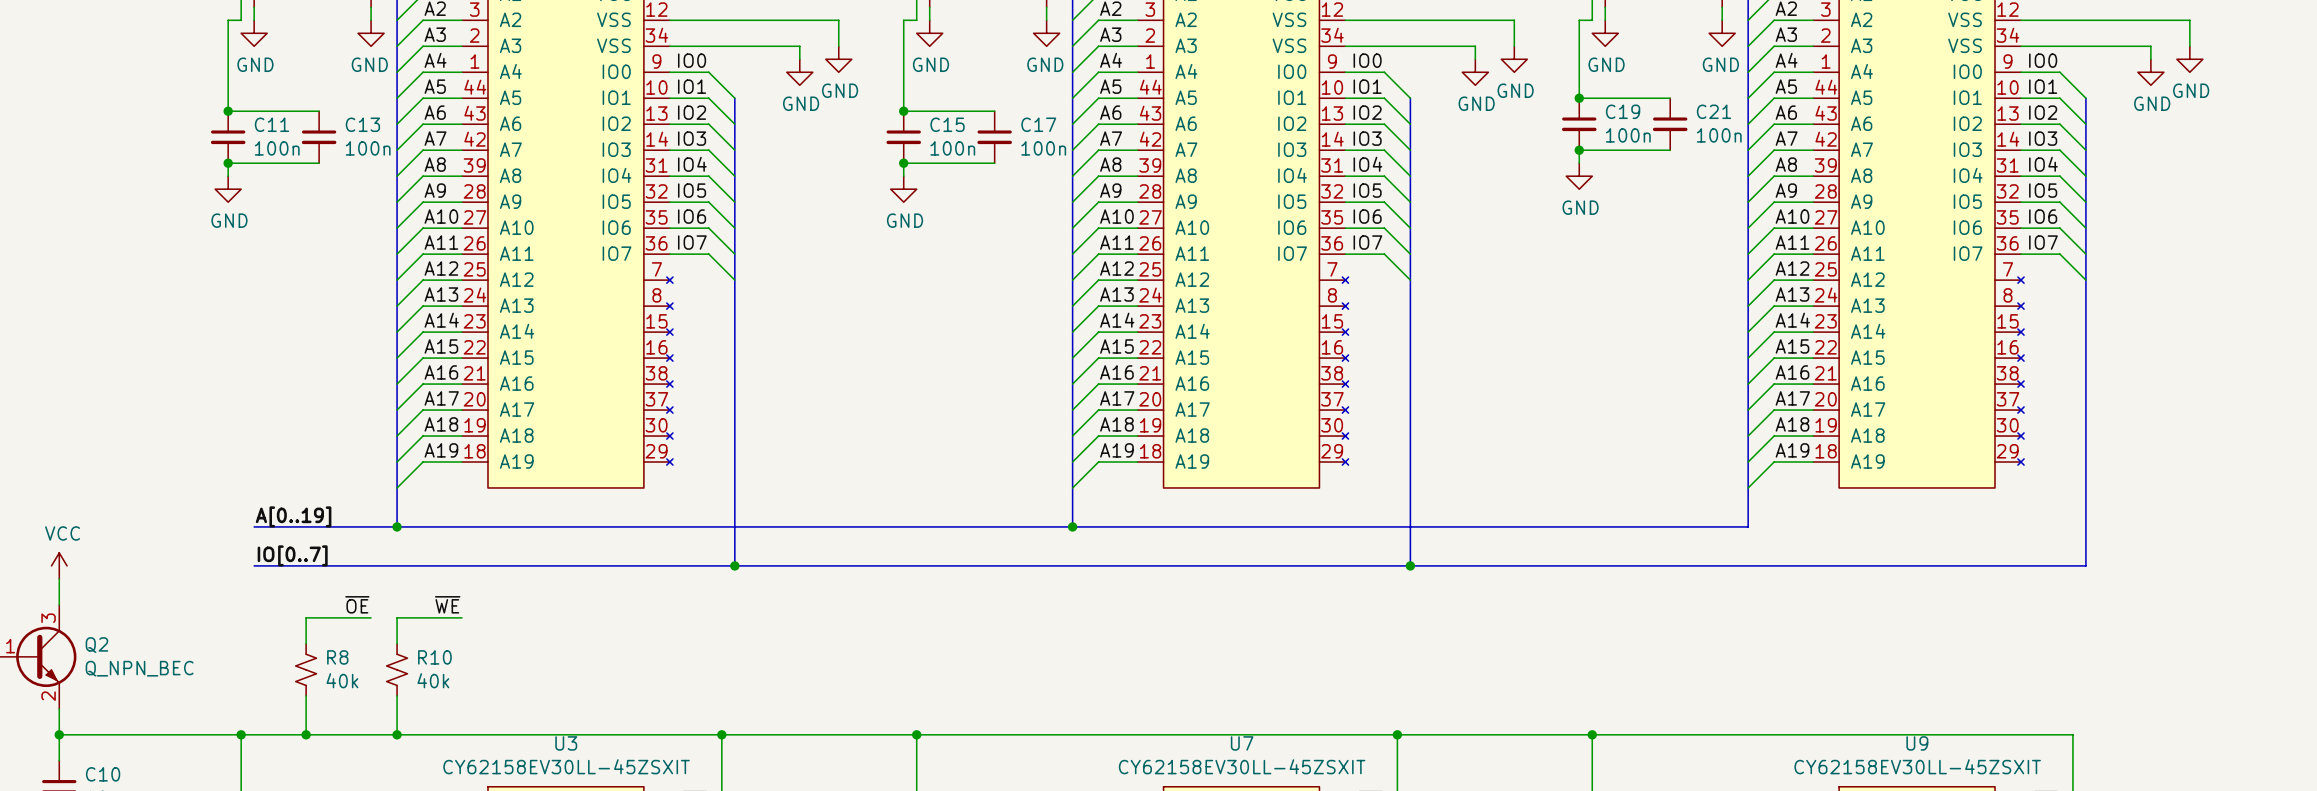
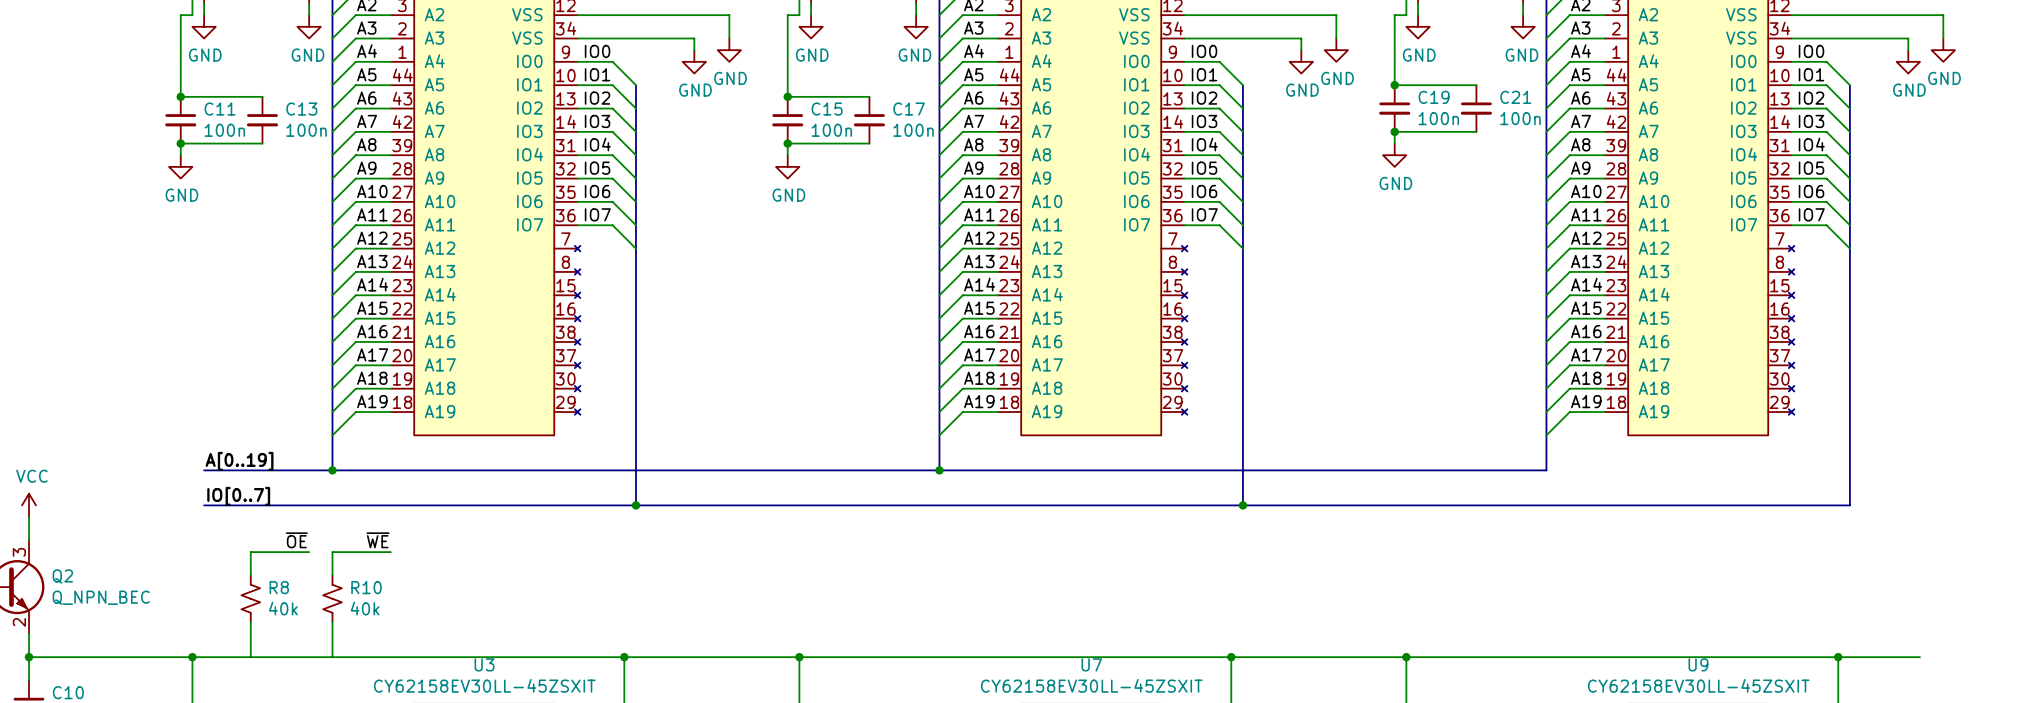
junction: (306, 734) -> none
junction: (397, 734) -> none
wire: none -> (1838, 657) (1919, 657)
junction: none -> (1838, 657)

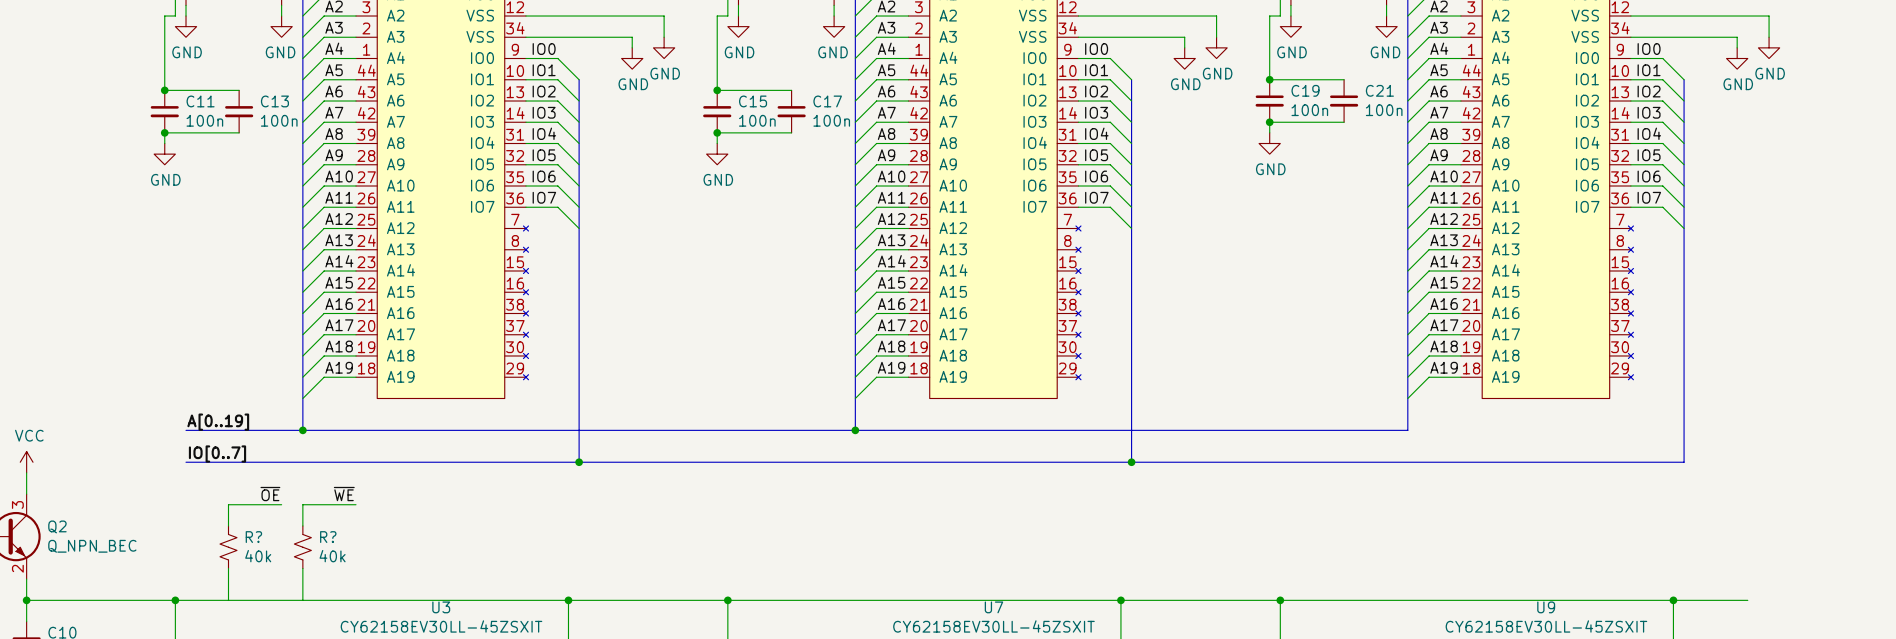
R8 name: R8 (279, 587) -> R? (253, 537)
R10 name: R10 (366, 587) -> R? (328, 537)

